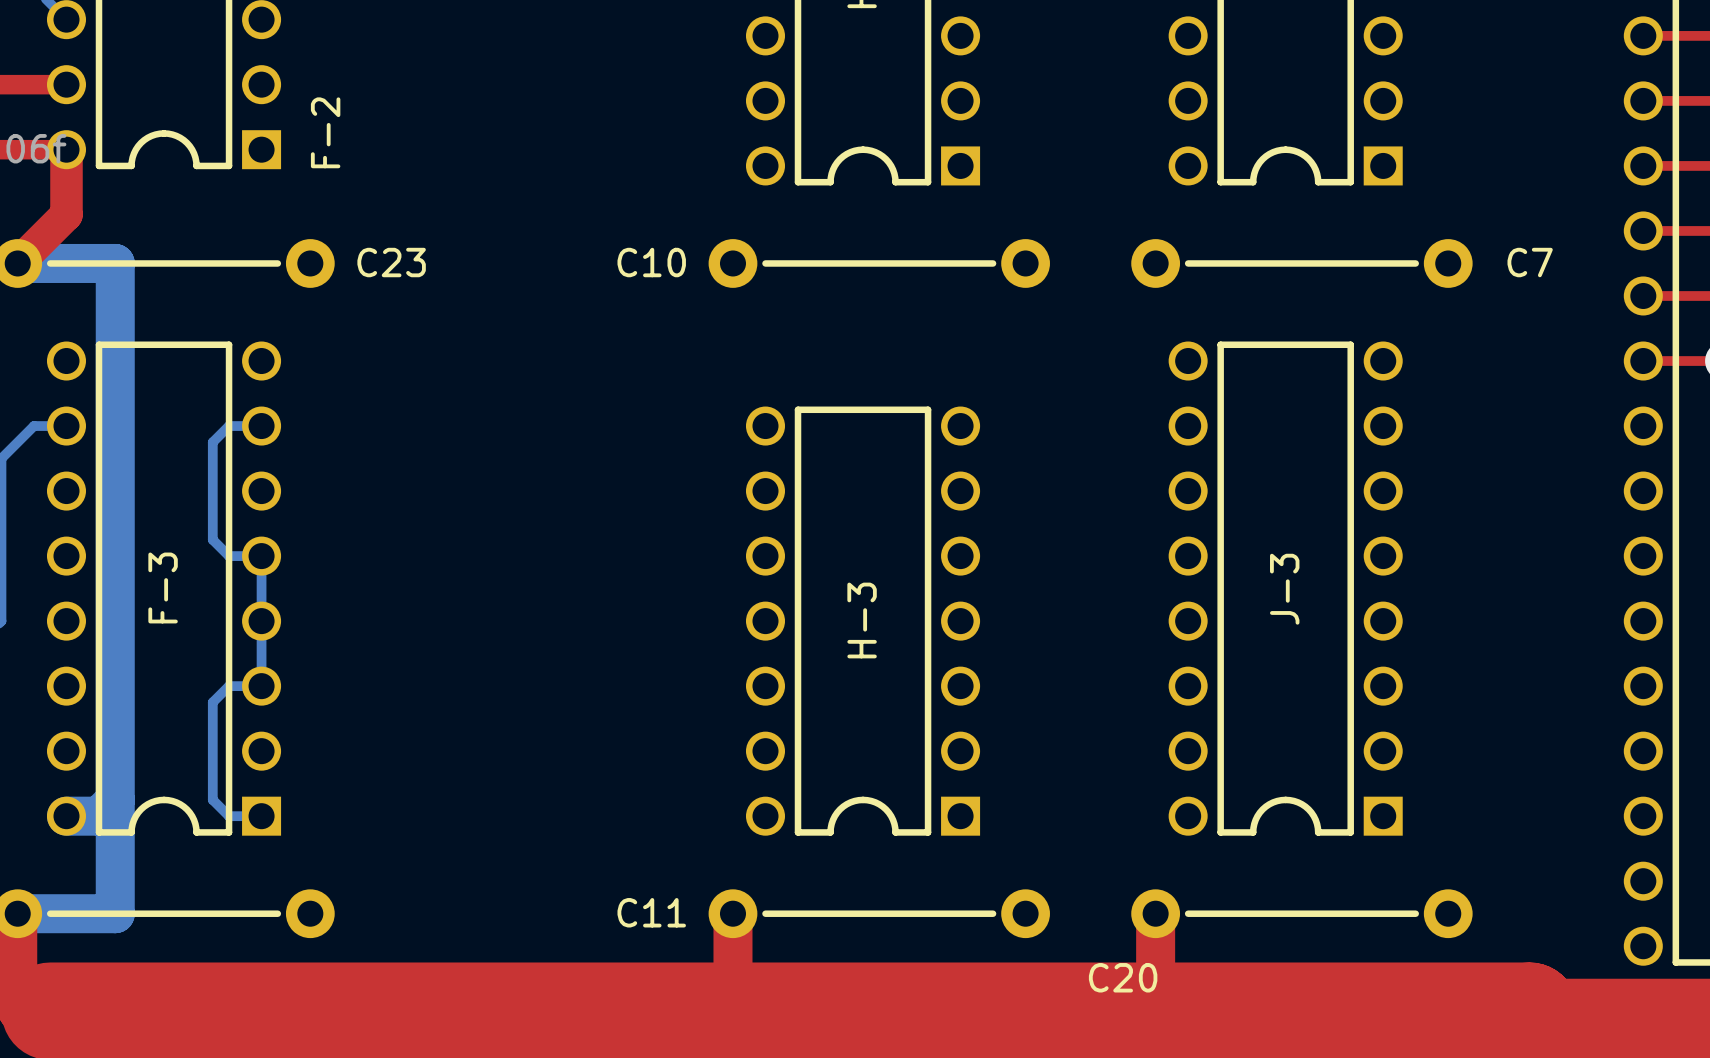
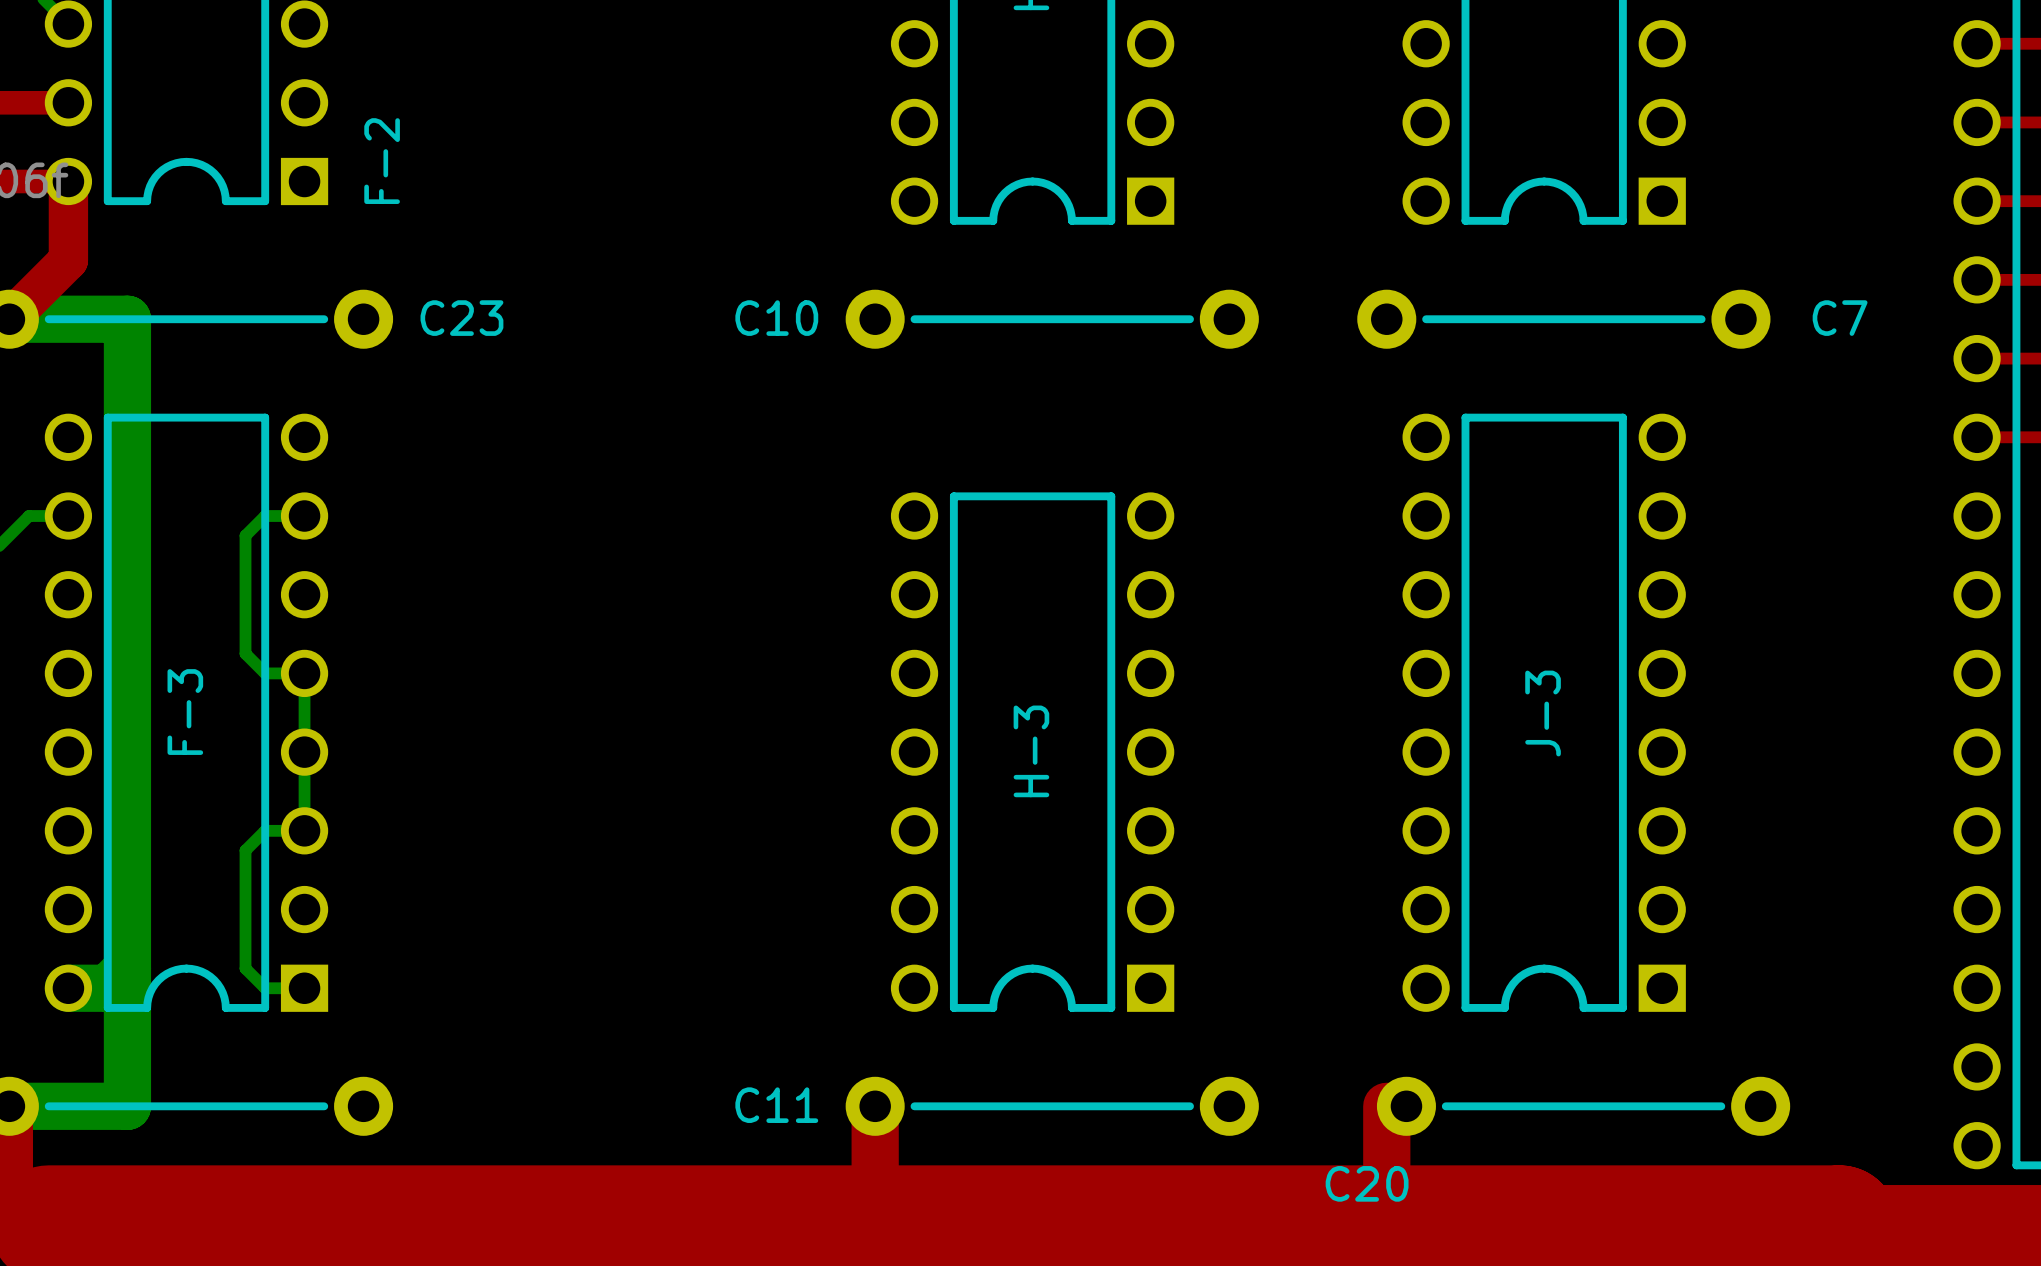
C20 position: (1301, 913) -> (1583, 1106)

